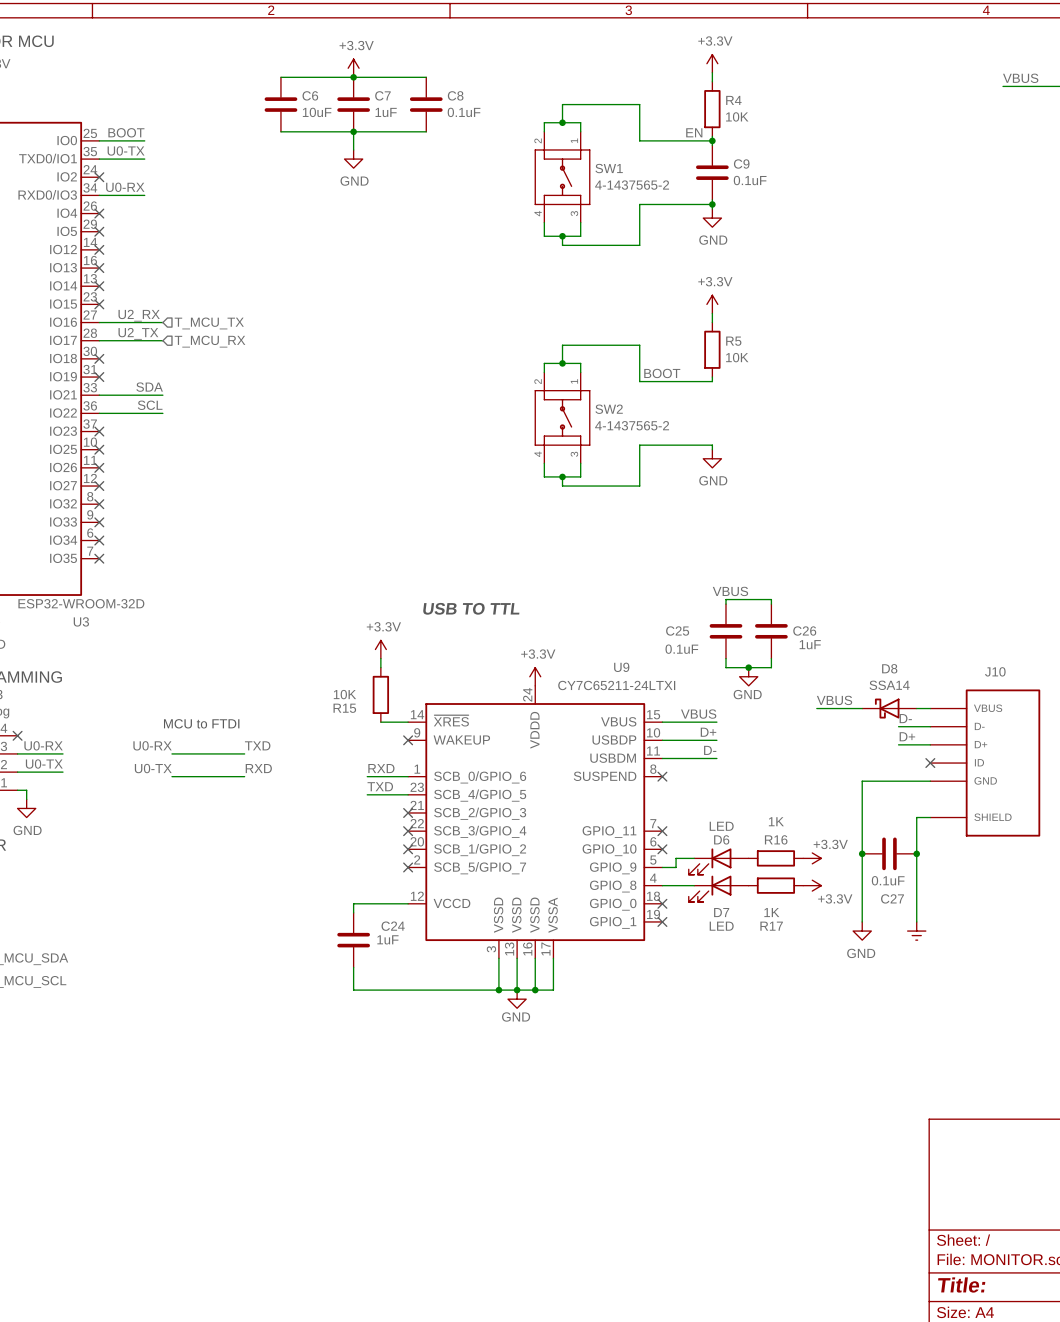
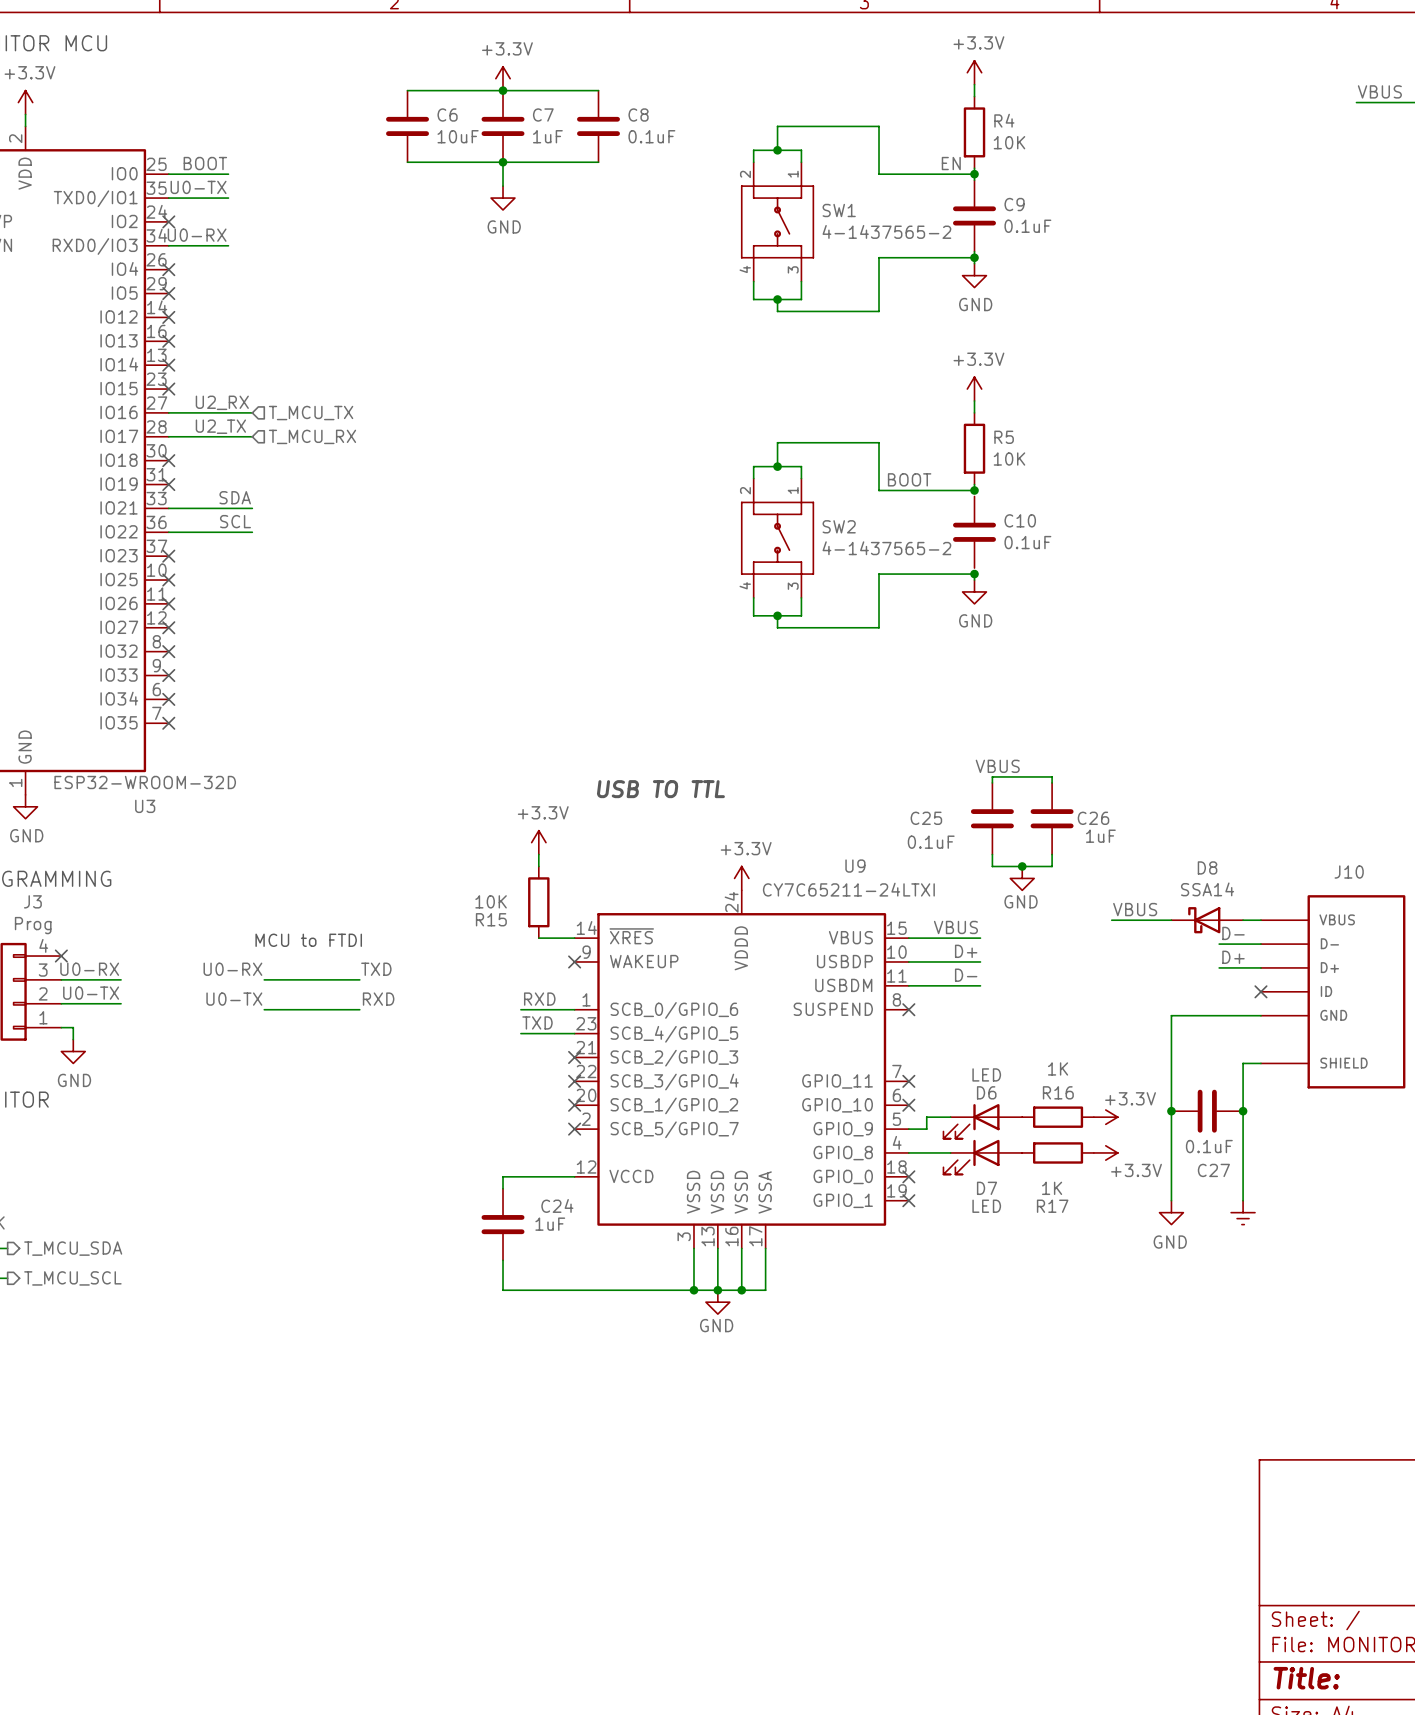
junction: none -> (974, 490)
C10: none -> 0.1uF (974, 532)
junction: none -> (974, 574)

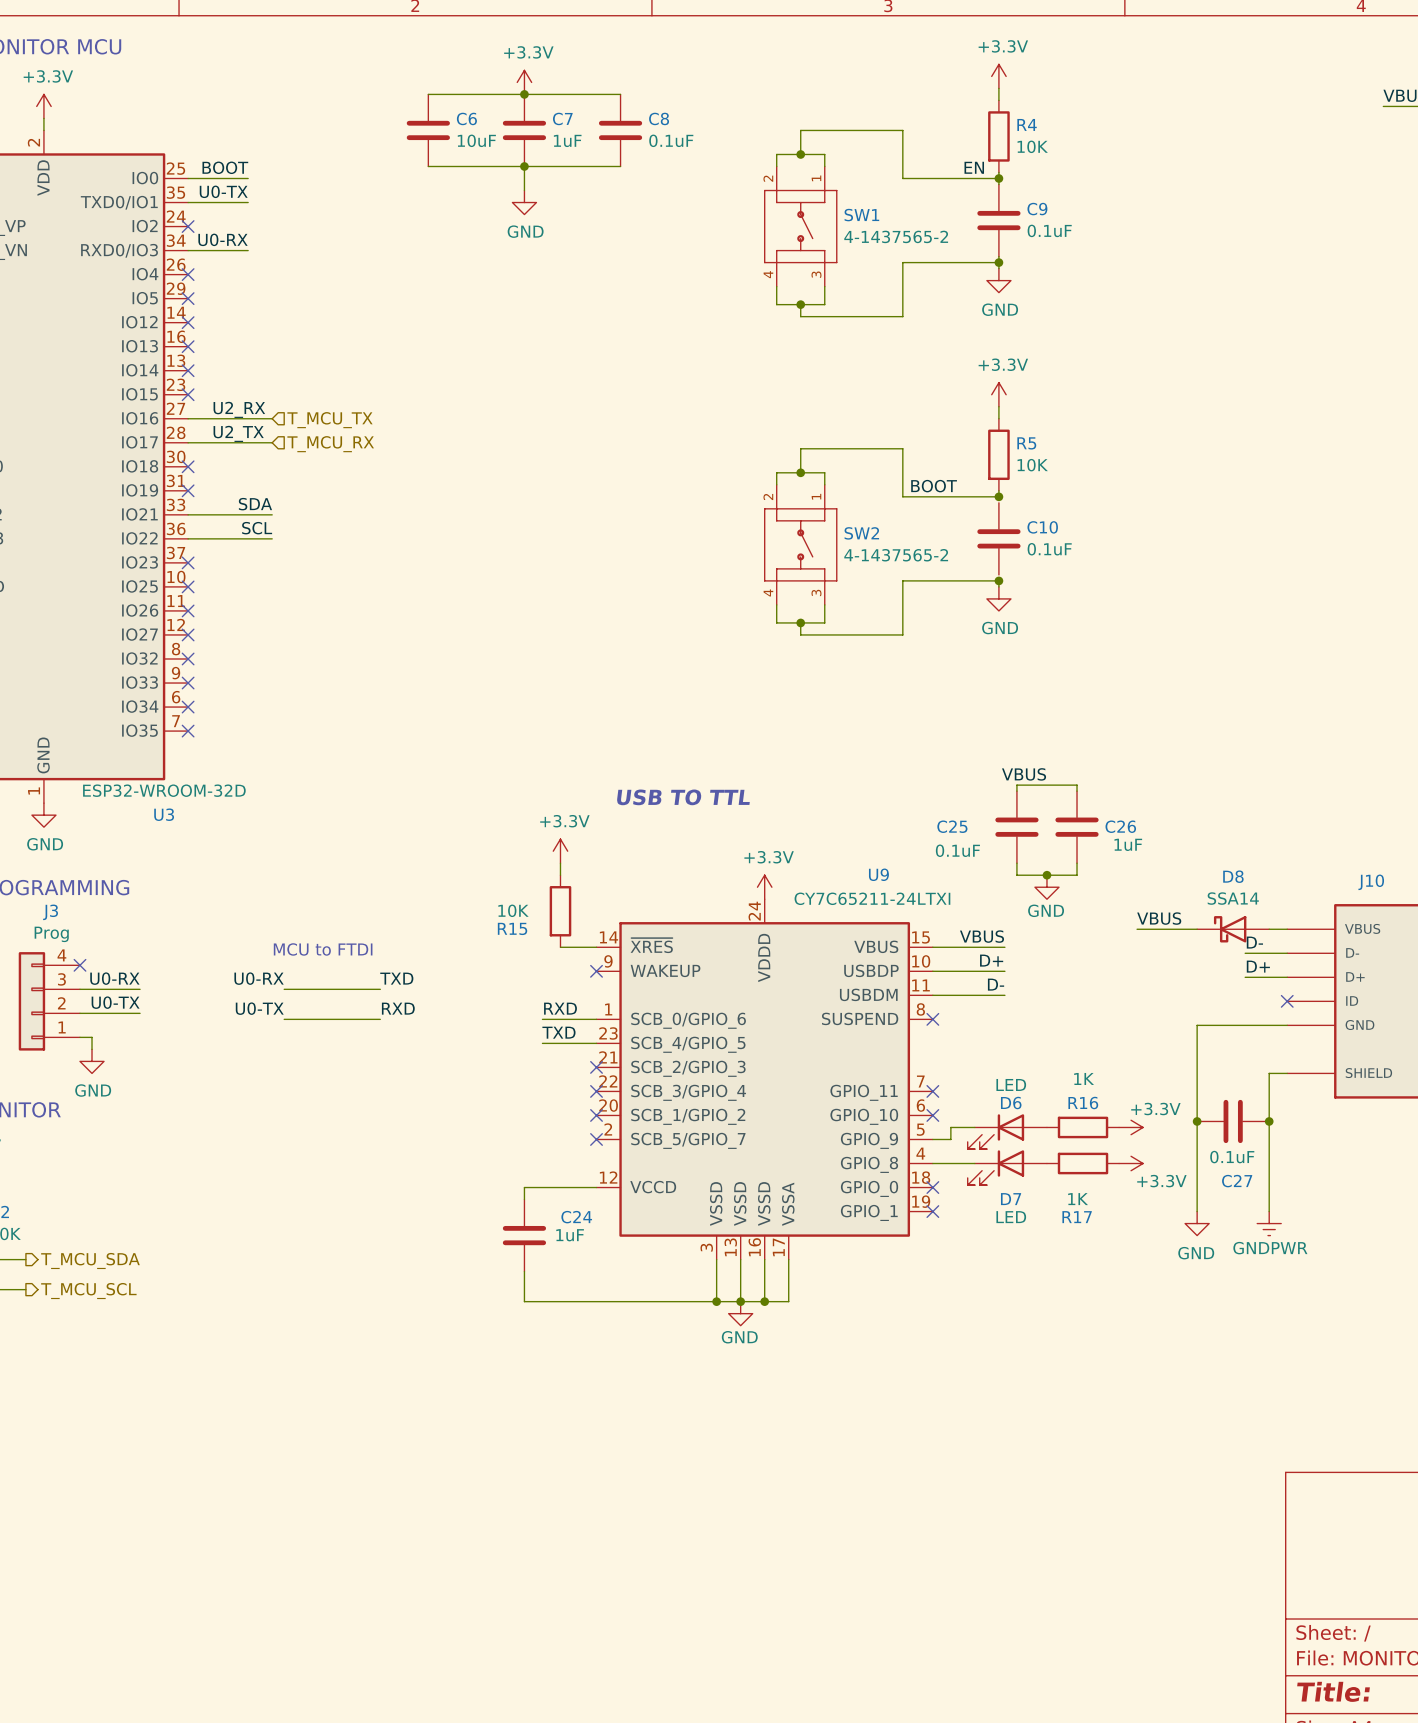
power symbol text: none -> GNDPWR (1270, 1248)

